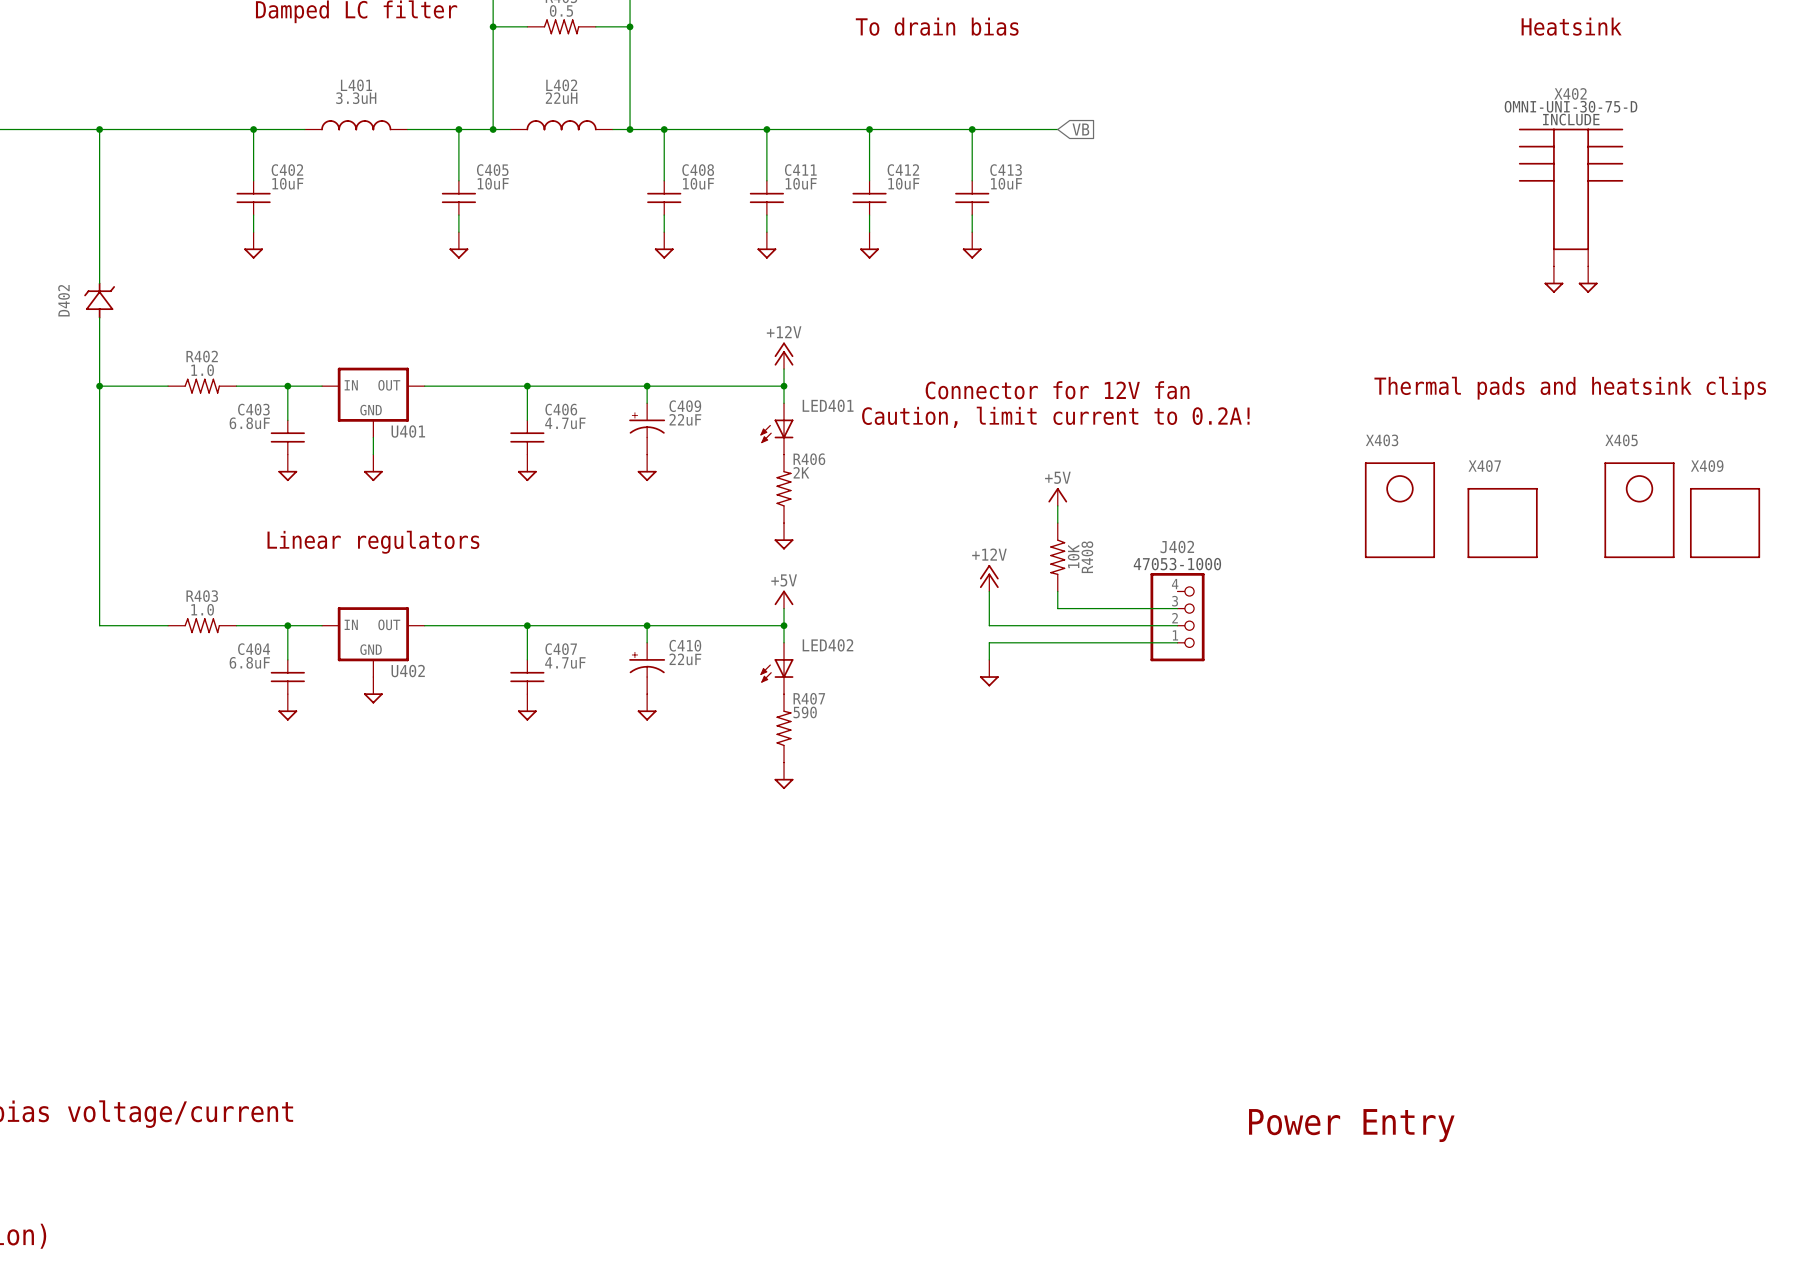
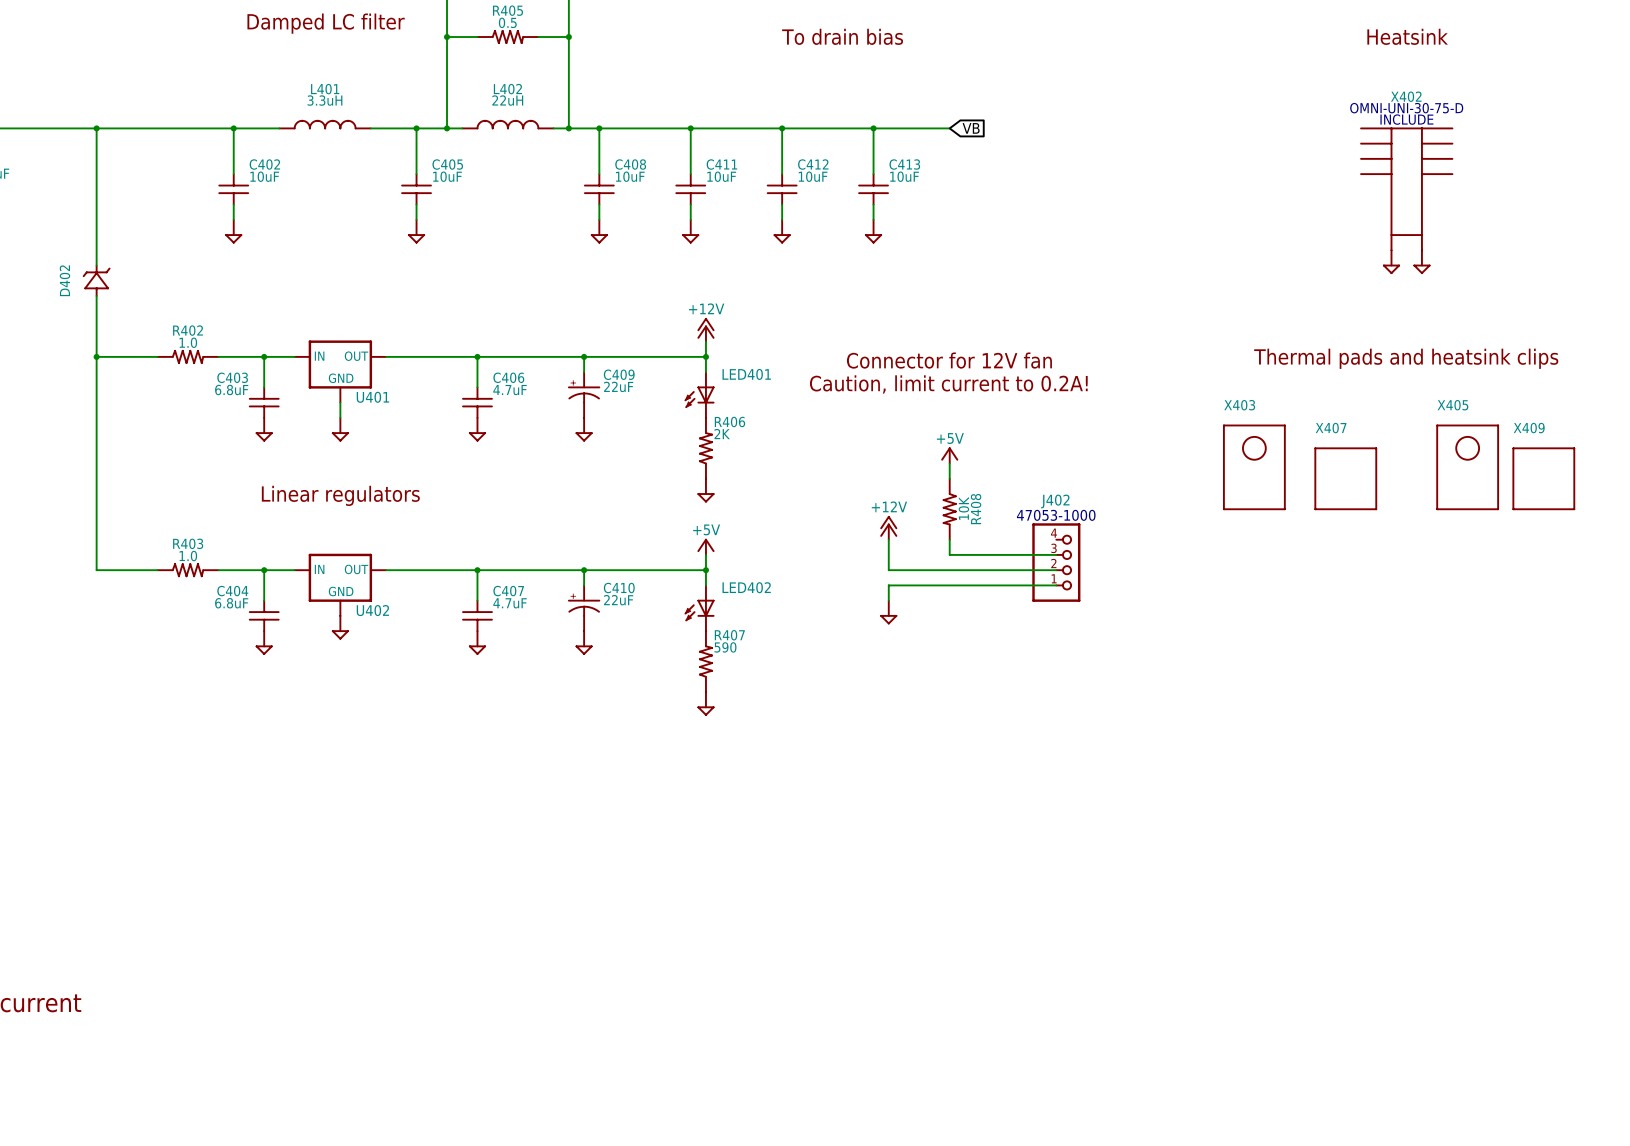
text: Power Entry (1351, 1125) -> none

